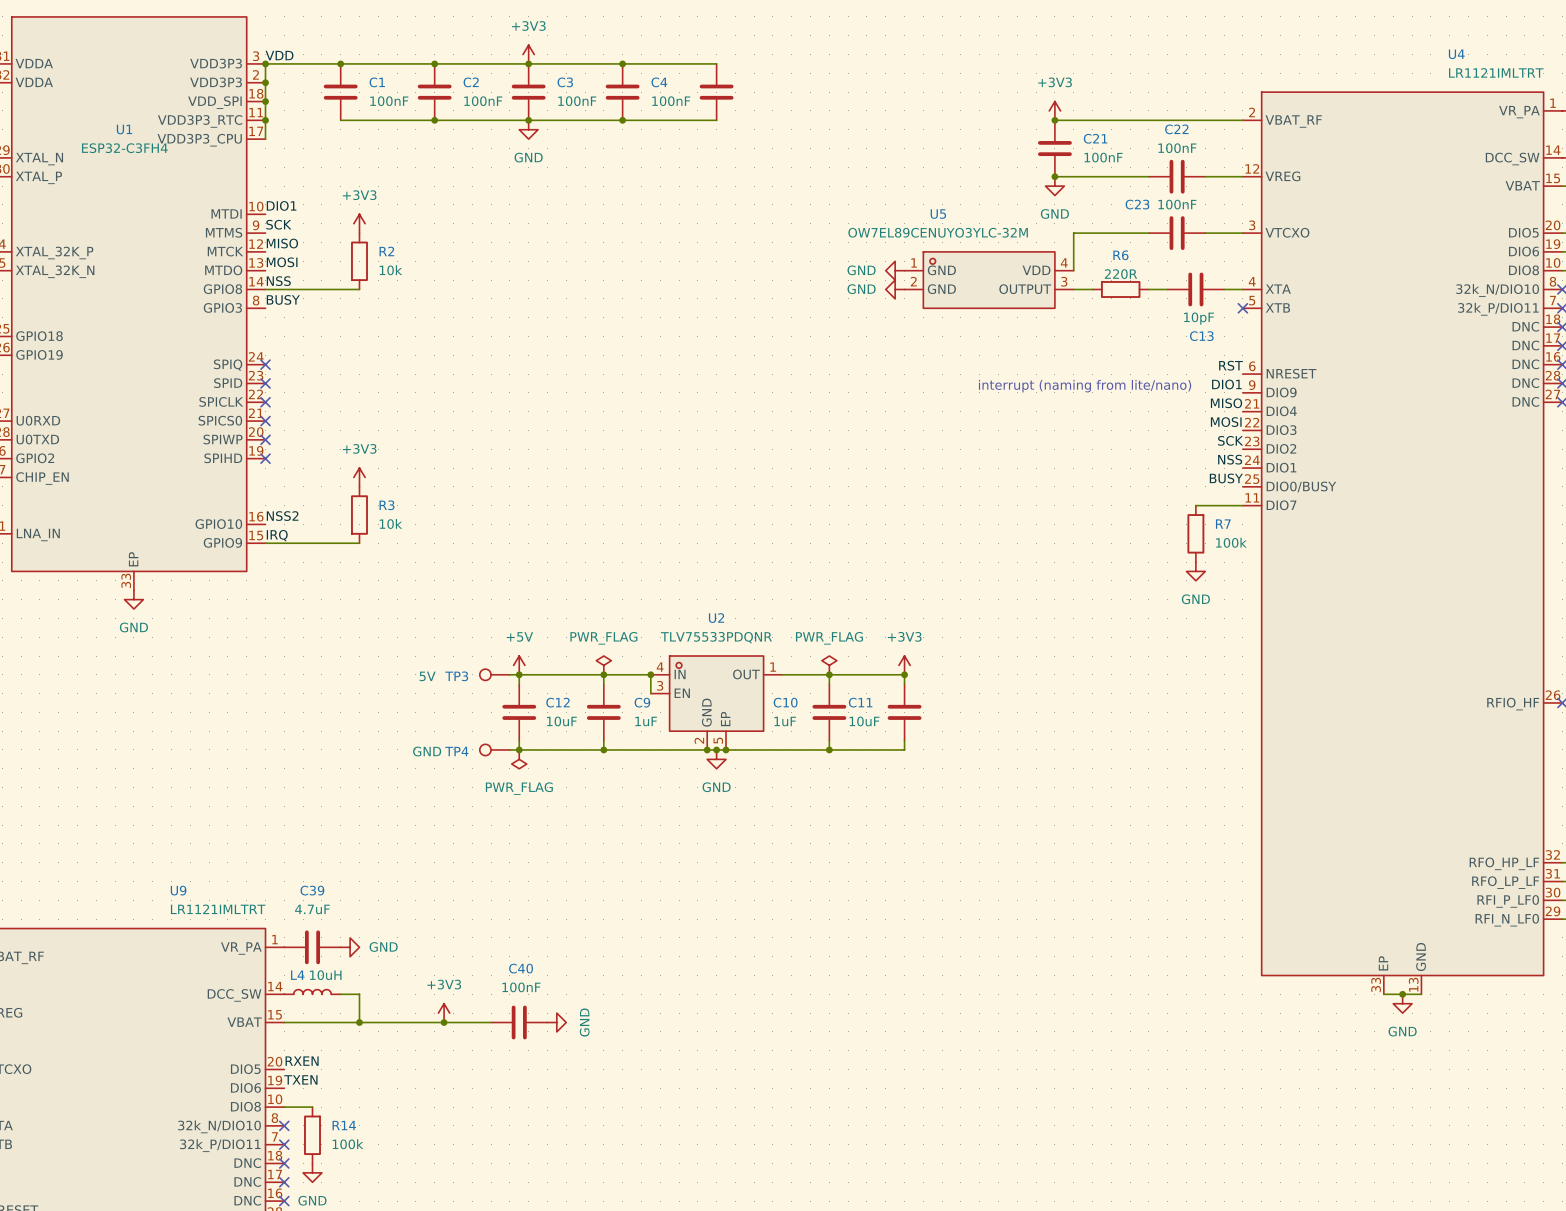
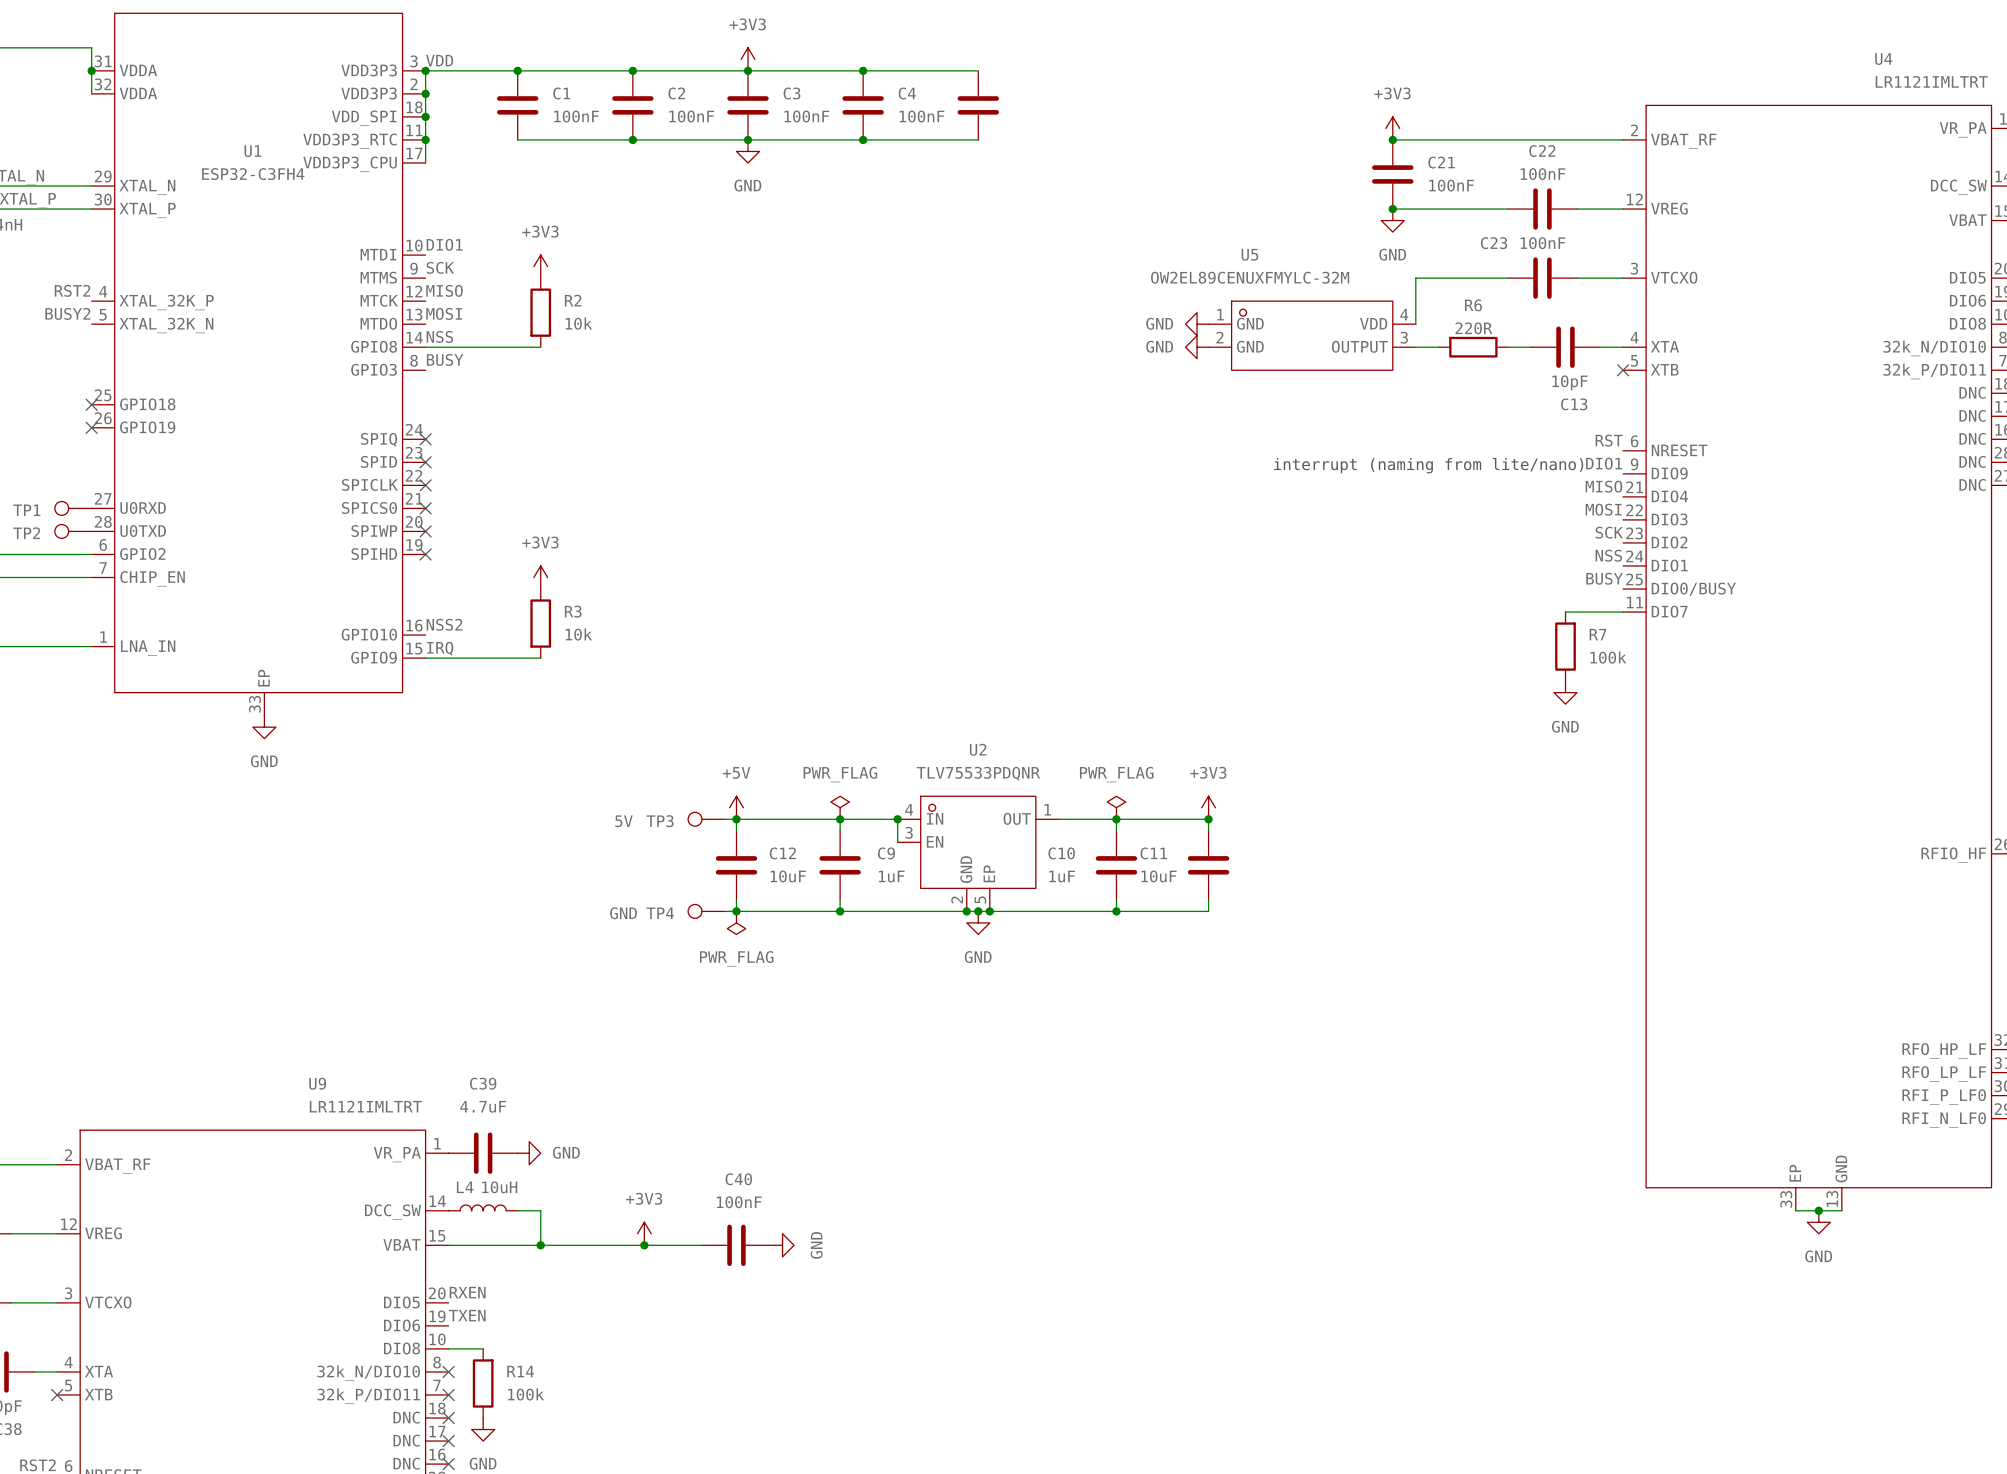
U5 value: OW7EL89CENUYO3YLC-32M (938, 232) -> OW2EL89CENUXFMYLC-32M (1250, 277)

